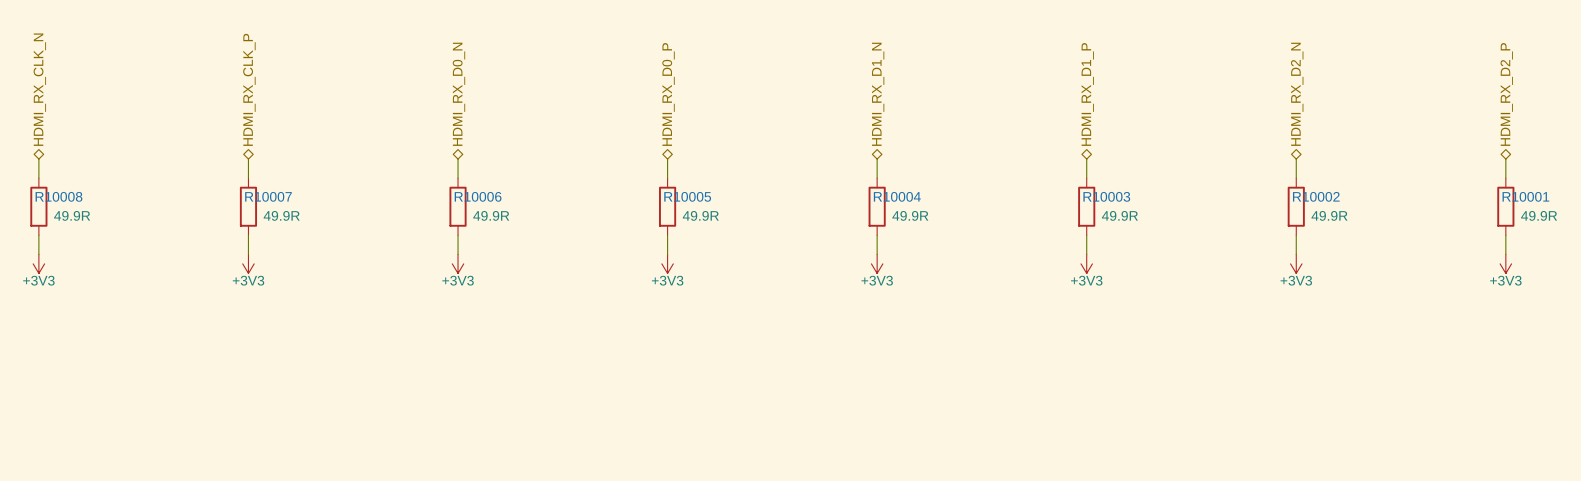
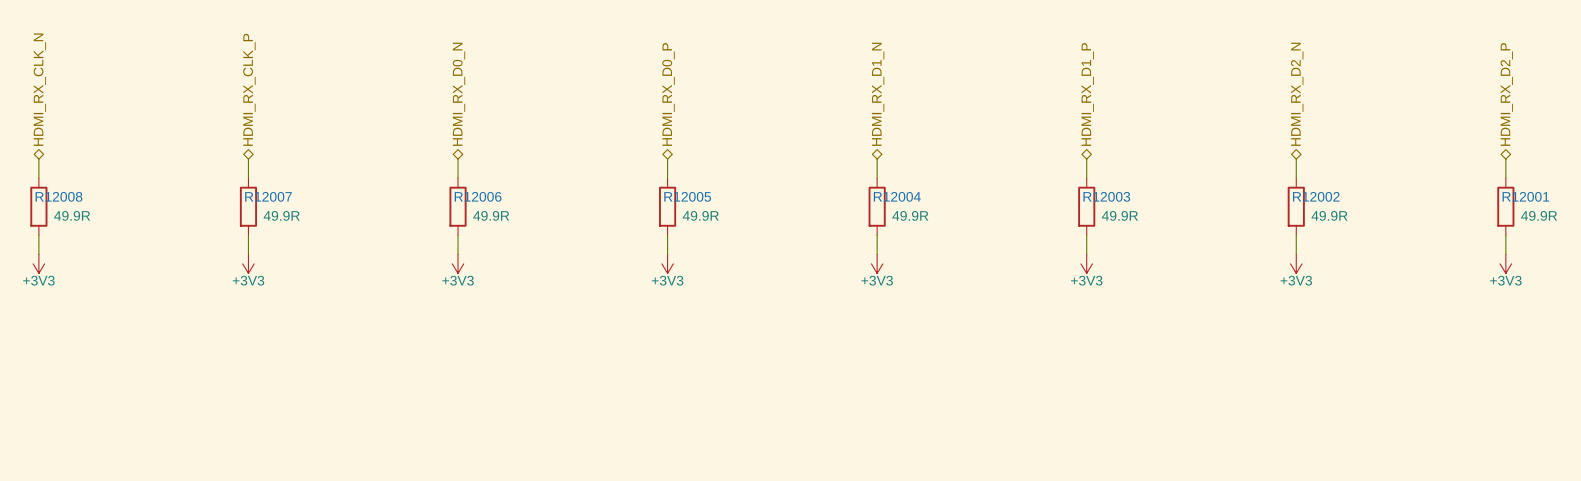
R10008 name: R10008 (58, 196) -> R12008 (58, 196)
R10007 name: R10007 (268, 196) -> R12007 (268, 196)
R10006 name: R10006 (478, 196) -> R12006 (478, 196)
R10005 name: R10005 (687, 196) -> R12005 (687, 196)
R10004 name: R10004 (897, 196) -> R12004 (897, 196)
R10003 name: R10003 (1106, 196) -> R12003 (1106, 196)
R10002 name: R10002 (1316, 196) -> R12002 (1316, 196)
R10001 name: R10001 (1525, 196) -> R12001 (1525, 196)

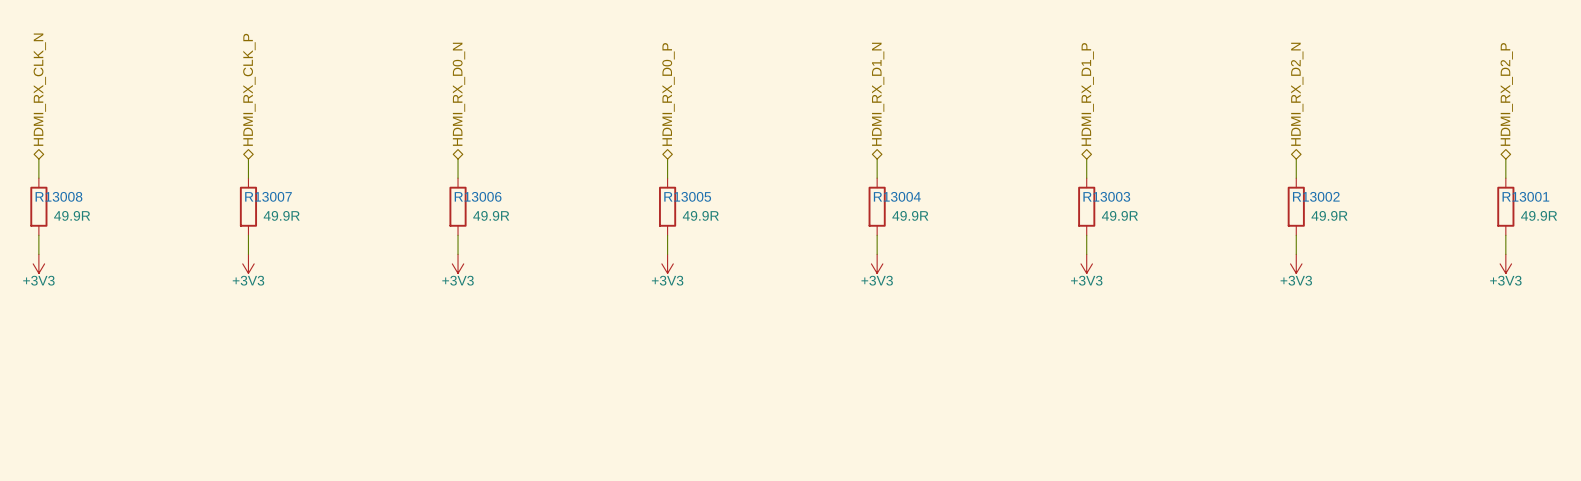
R12008 name: R12008 (58, 196) -> R13008 (58, 196)
R12007 name: R12007 (268, 196) -> R13007 (268, 196)
R12006 name: R12006 (478, 196) -> R13006 (478, 196)
R12005 name: R12005 (687, 196) -> R13005 (687, 196)
R12004 name: R12004 (897, 196) -> R13004 (897, 196)
R12003 name: R12003 (1106, 196) -> R13003 (1106, 196)
R12002 name: R12002 (1316, 196) -> R13002 (1316, 196)
R12001 name: R12001 (1525, 196) -> R13001 (1525, 196)

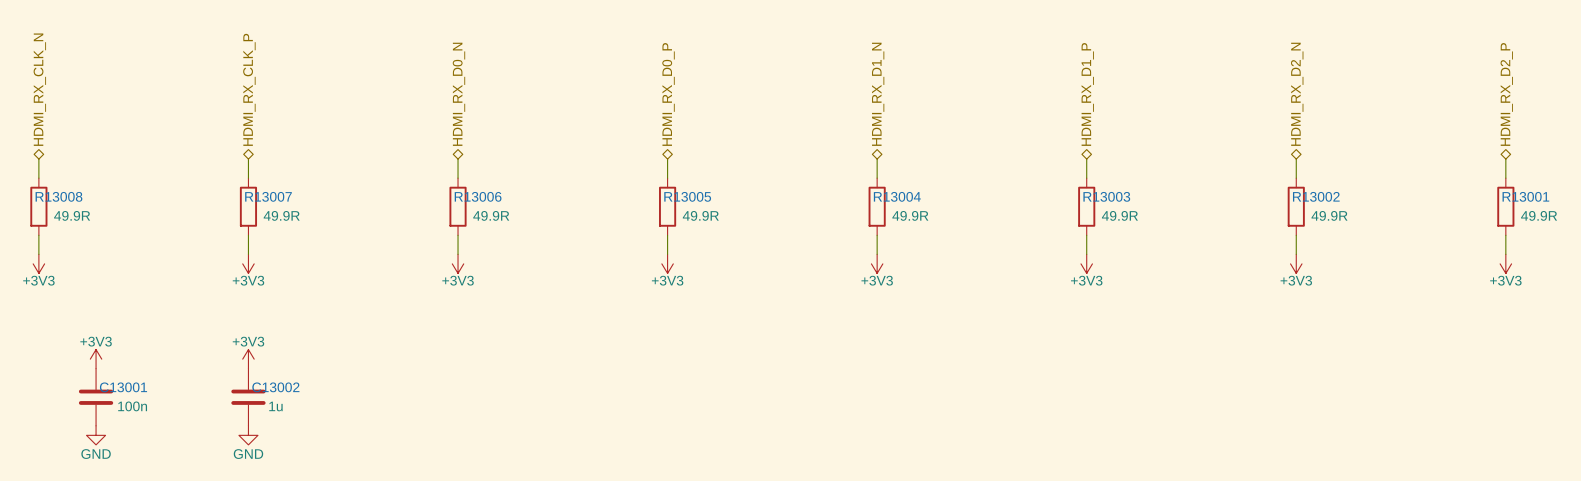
power symbol: none -> +3V3 (96, 359)
power symbol: none -> +3V3 (248, 359)
C13001: none -> 100n (96, 397)
C13002: none -> 1u (248, 397)
power symbol: none -> GND (96, 435)
power symbol: none -> GND (248, 435)

